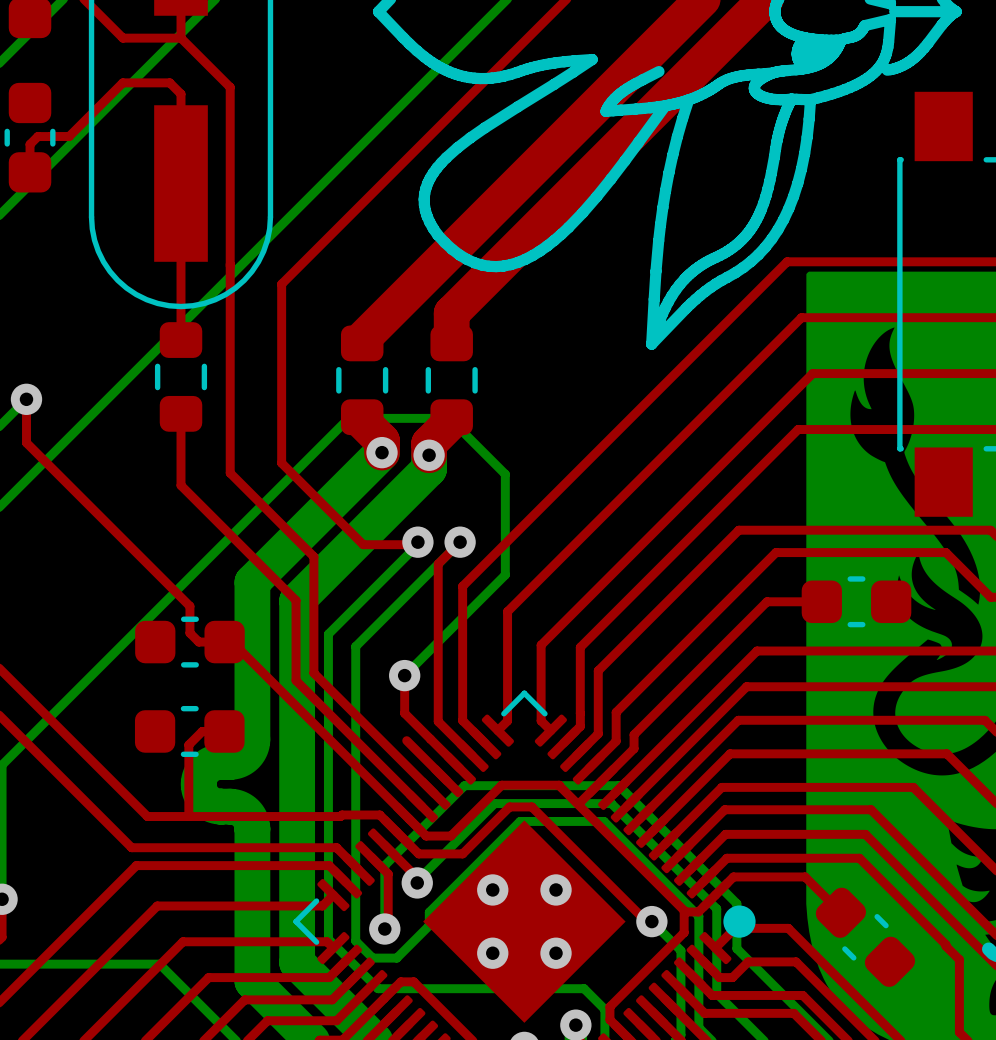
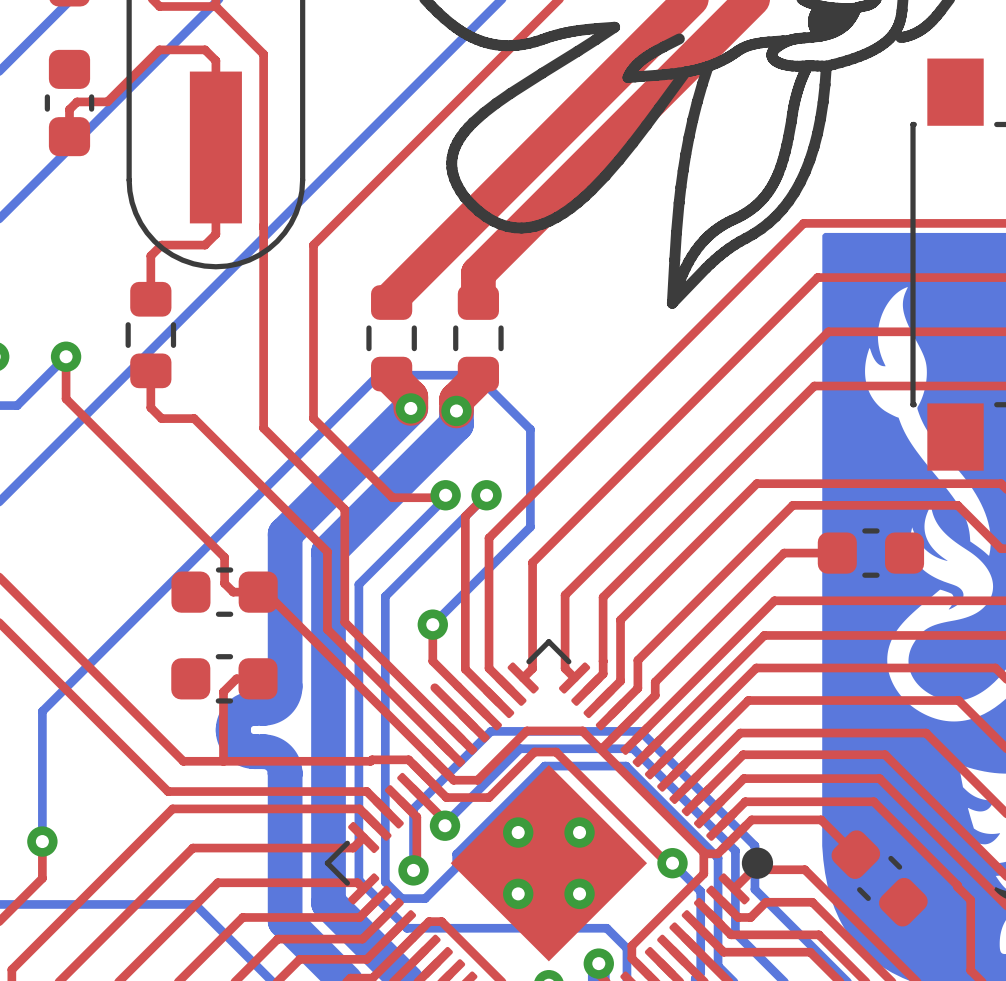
top track: (181, 272) (181, 340) -> (215, 234) (205, 245) (161, 245) (150, 255) (150, 295)
part position: (181, 376) -> (150, 335)
top track: (181, 413) (181, 485) -> (150, 374) (150, 407) (161, 418) (194, 418) (215, 440)

